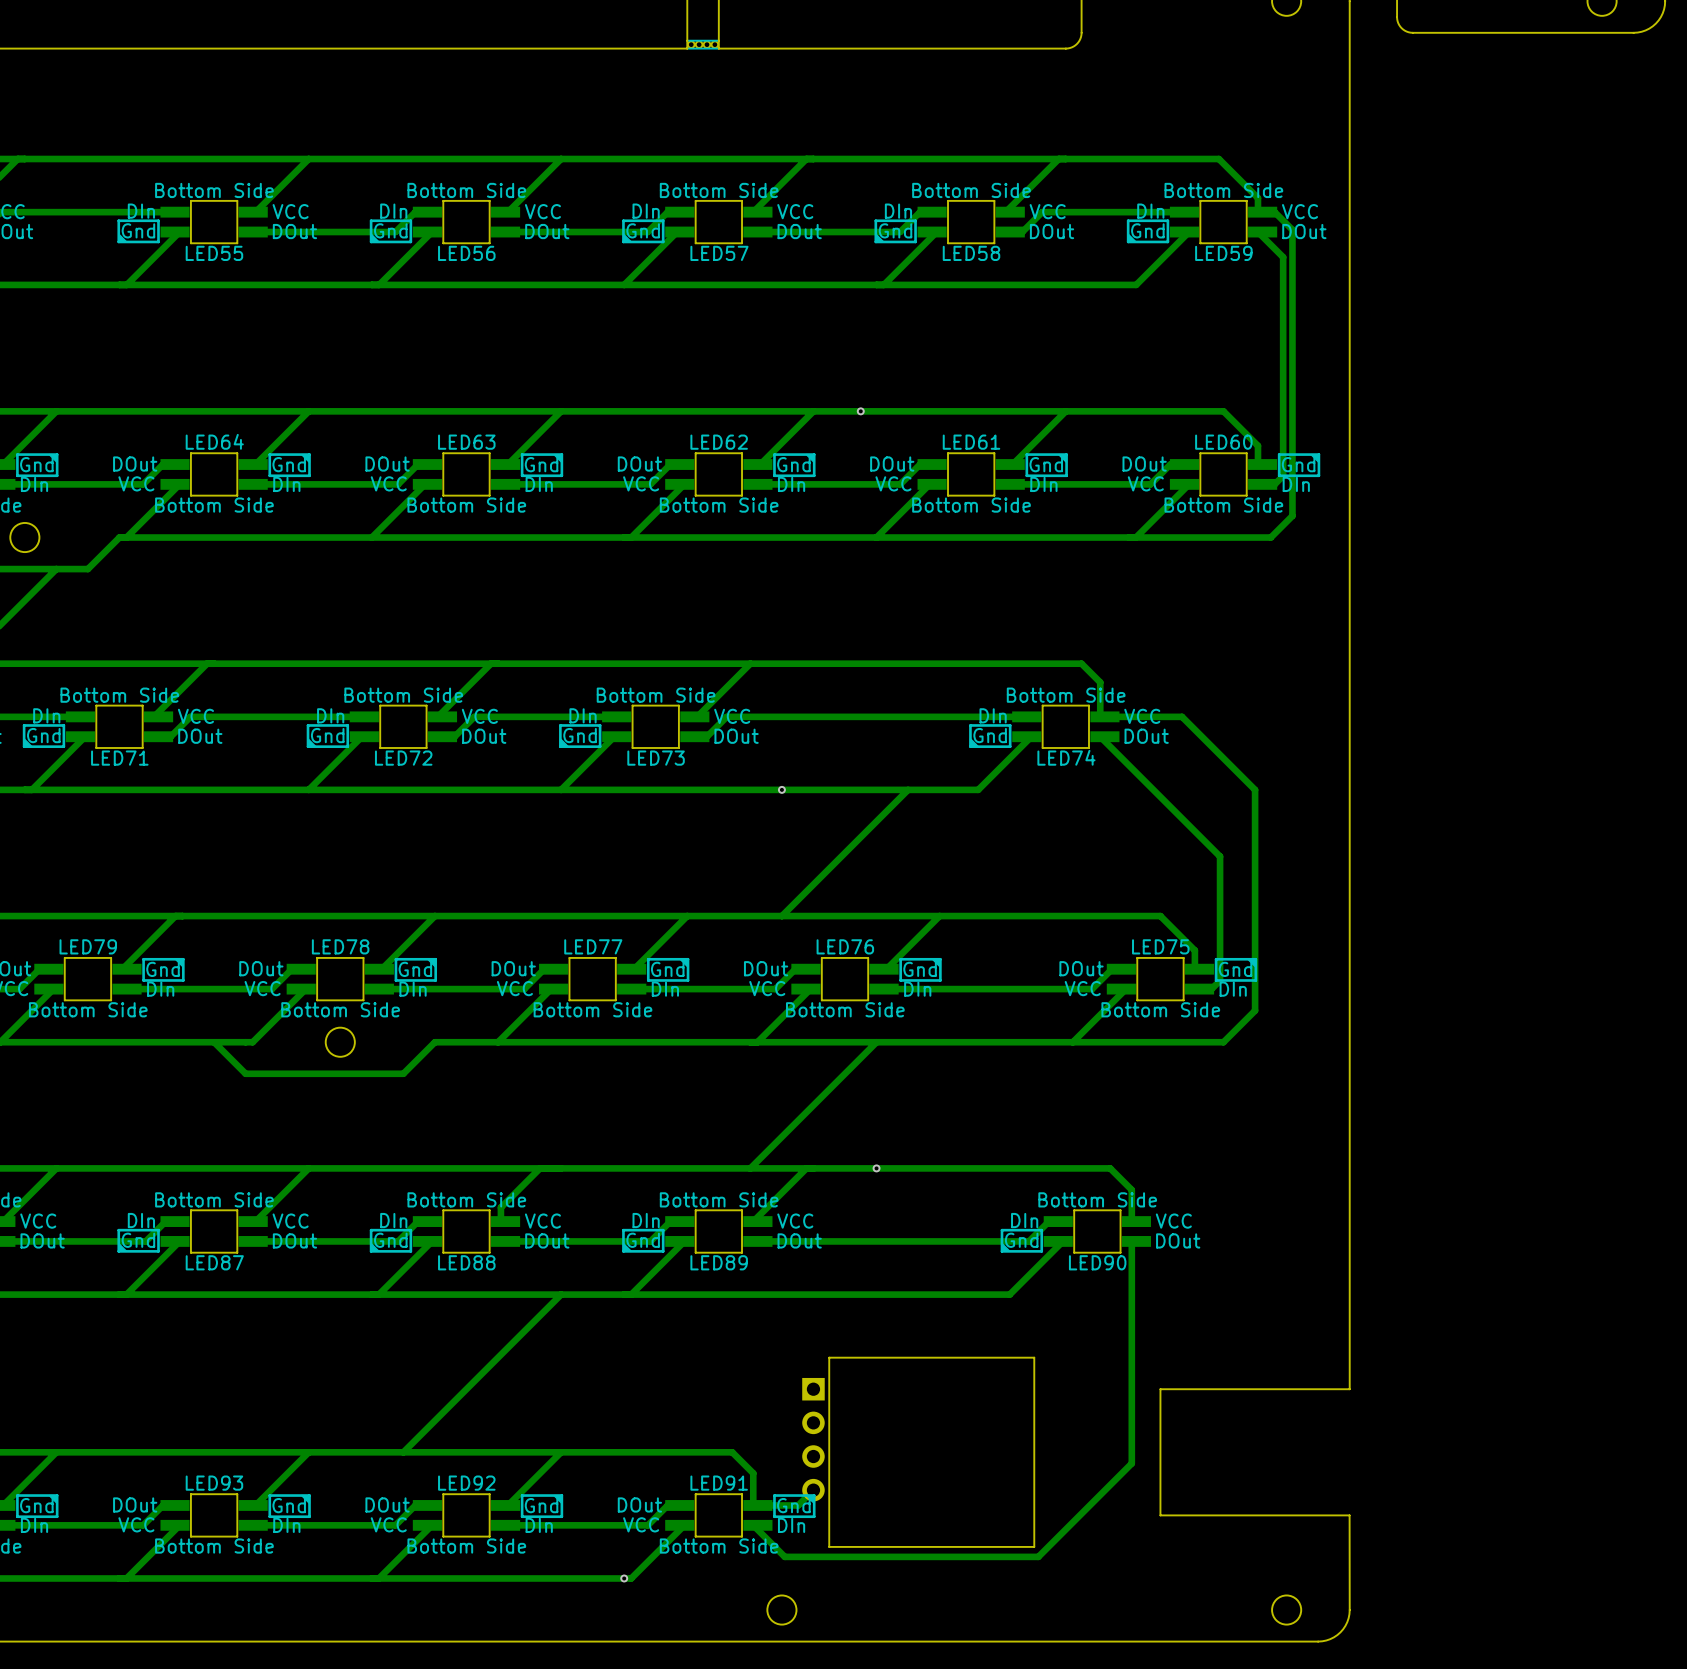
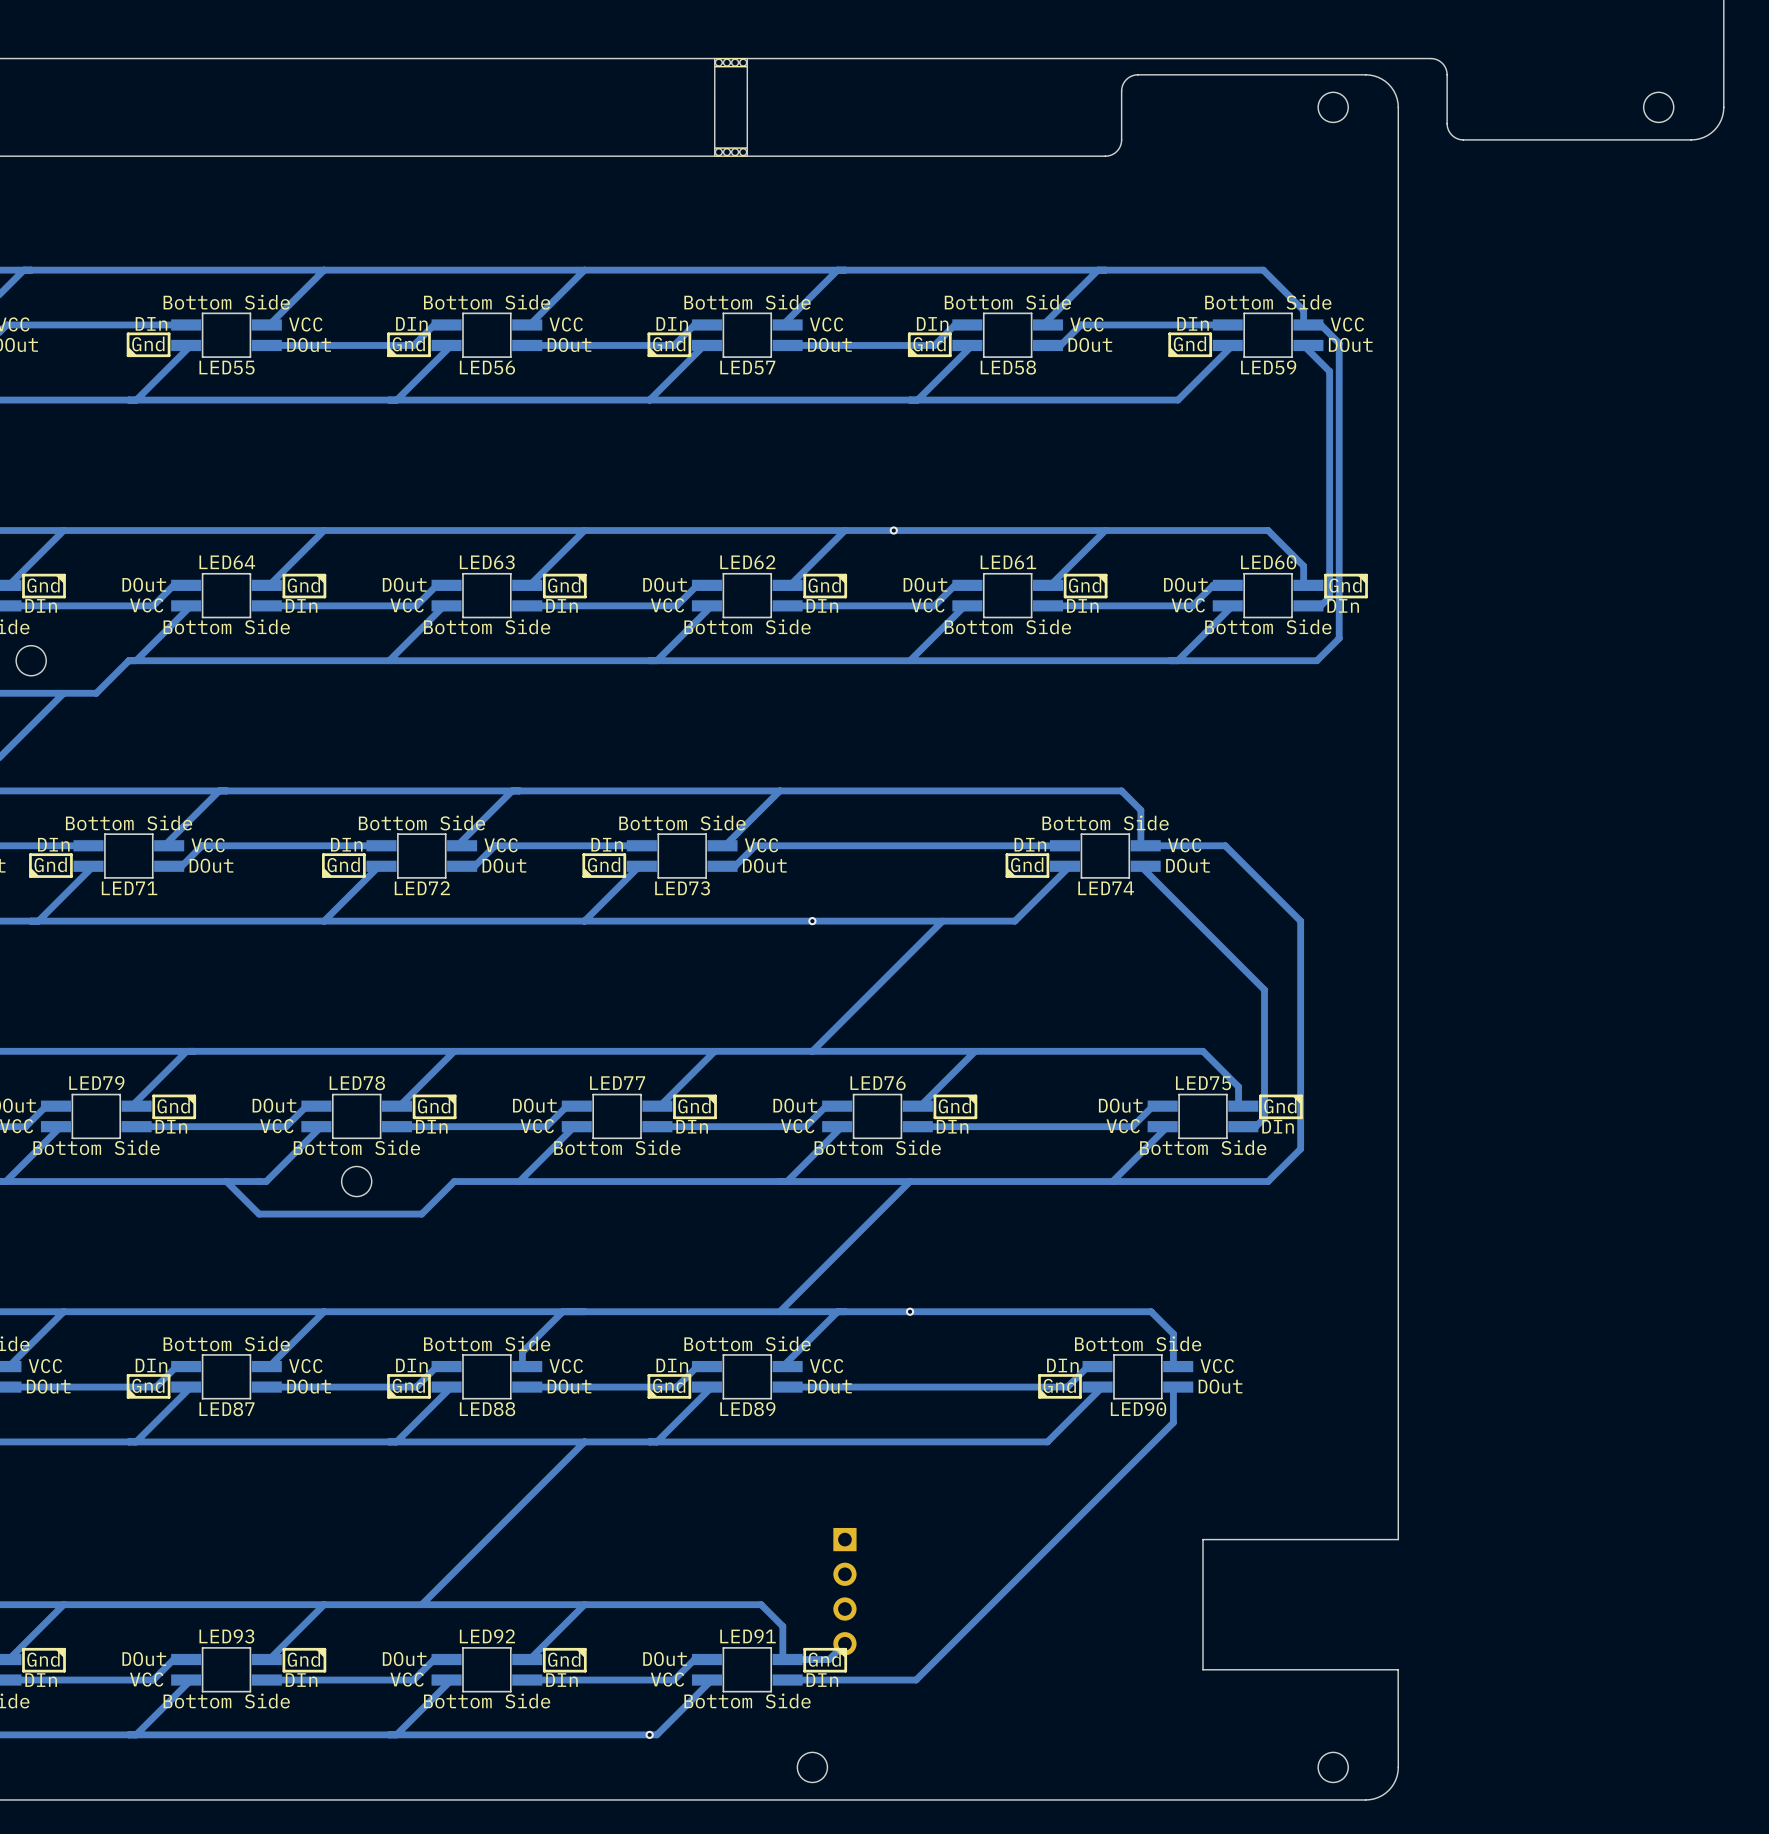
track: (1131, 1275) (1131, 1463) (1038, 1556) (784, 1556) (753, 1525) -> (1173, 1422) (916, 1680) (782, 1680)
board edge: (1034, 1357) (829, 1357) (829, 1546) (1034, 1546) (1034, 1357) -> none

